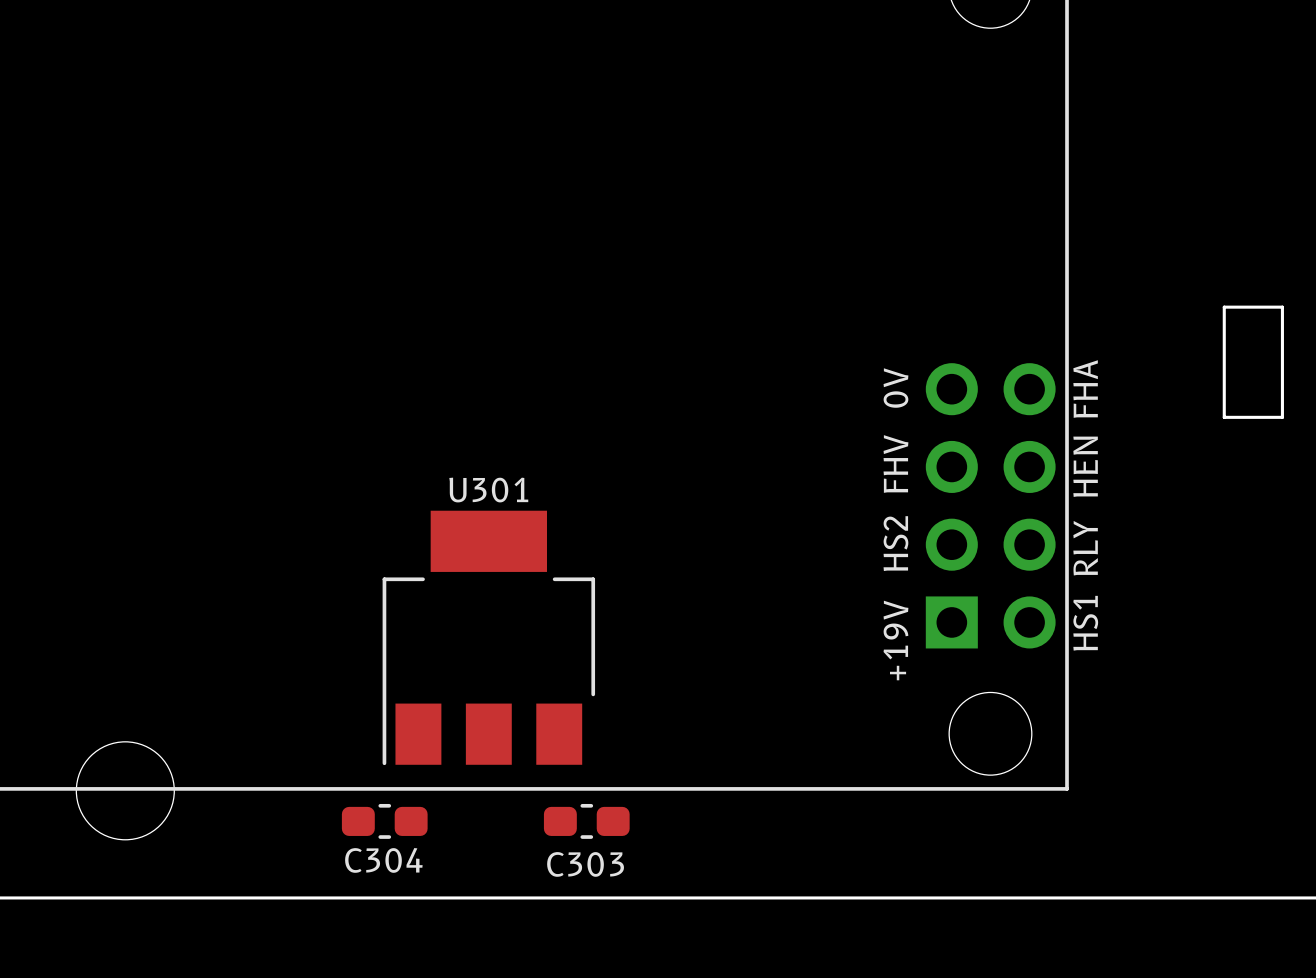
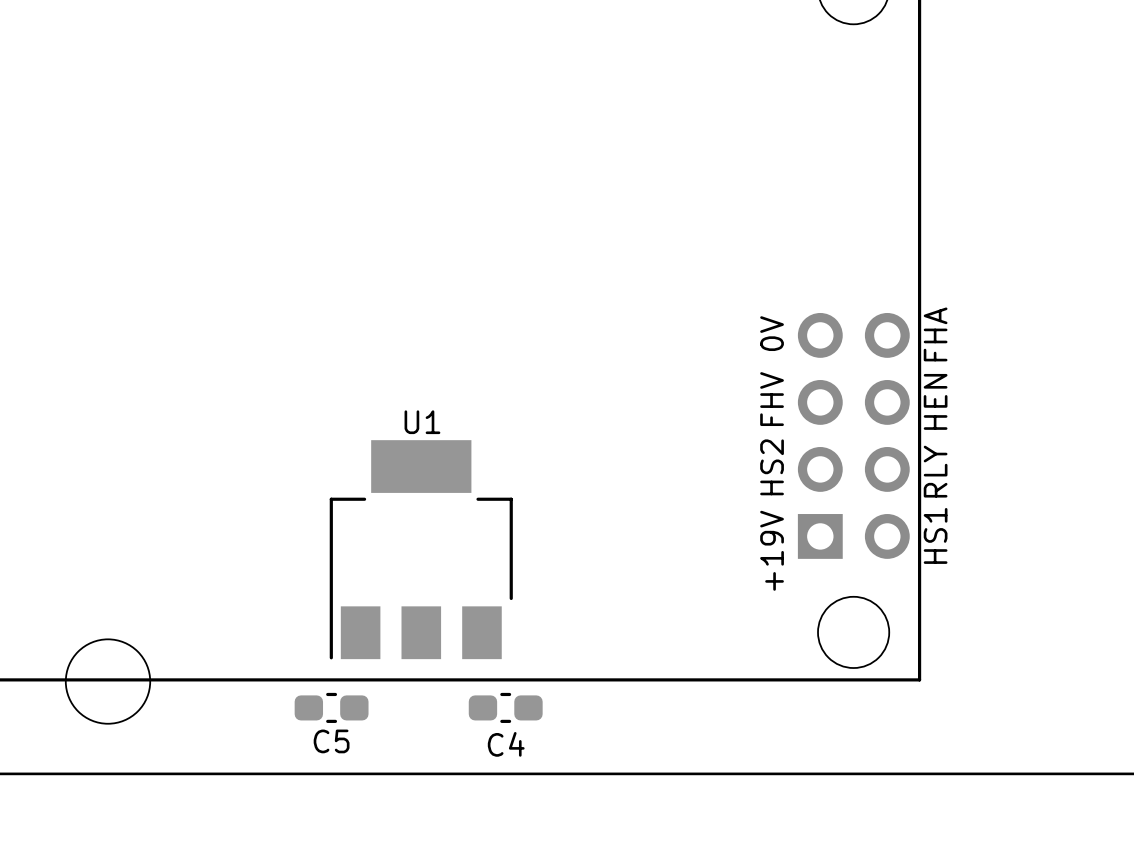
board edge: (1224, 307) (1282, 307) (1282, 417) (1224, 417) (1224, 307) -> none
U301 name: U301 (488, 490) -> U1 (422, 422)
C304 name: C304 (383, 860) -> C5 (331, 741)
C303 name: C303 (585, 864) -> C4 (506, 744)

